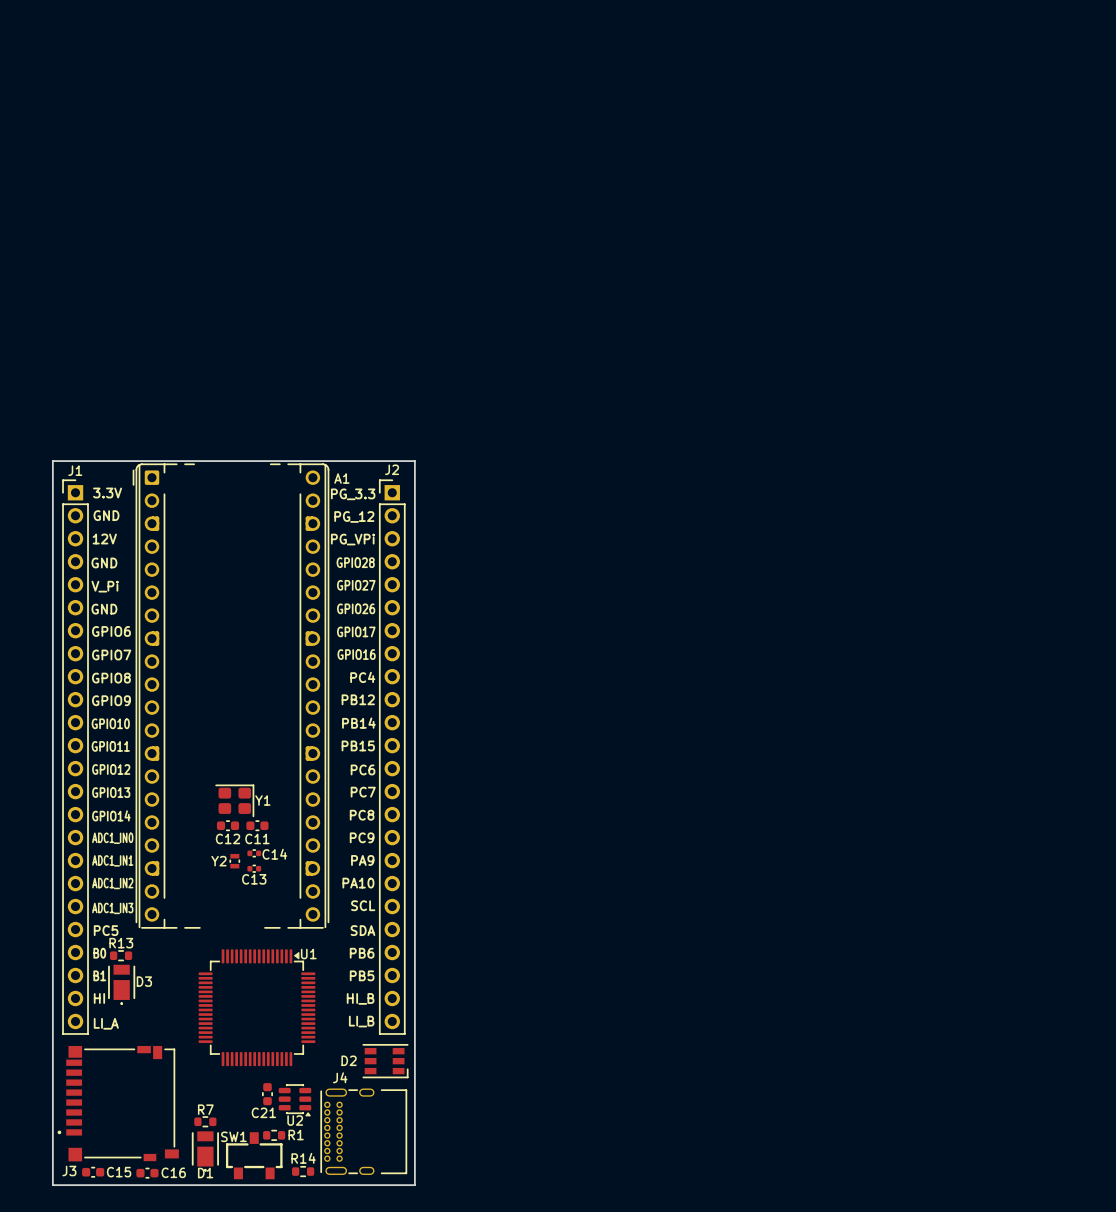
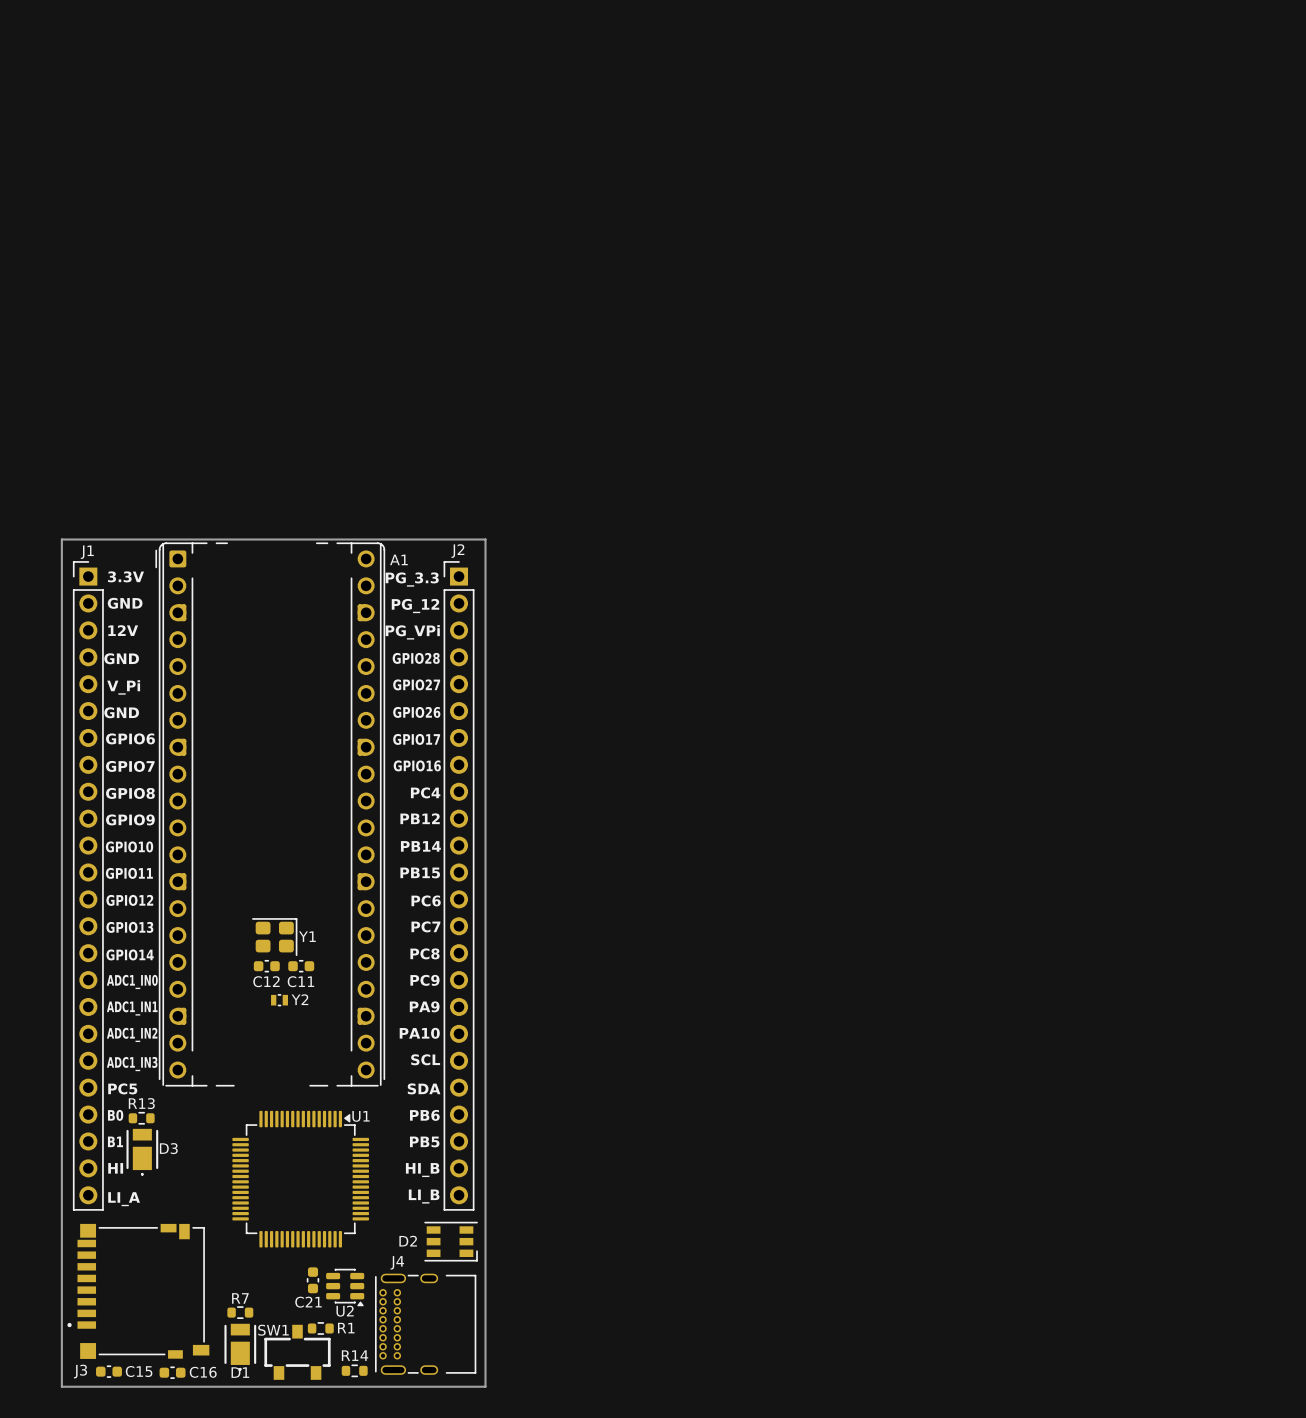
C14: (254, 853) -> none
Y2 name position: Y2 (218, 861) -> Y2 (299, 999)
Y2 rotation: 0° (234, 861) -> 90° clockwise (279, 1000)
C13: (254, 868) -> none

